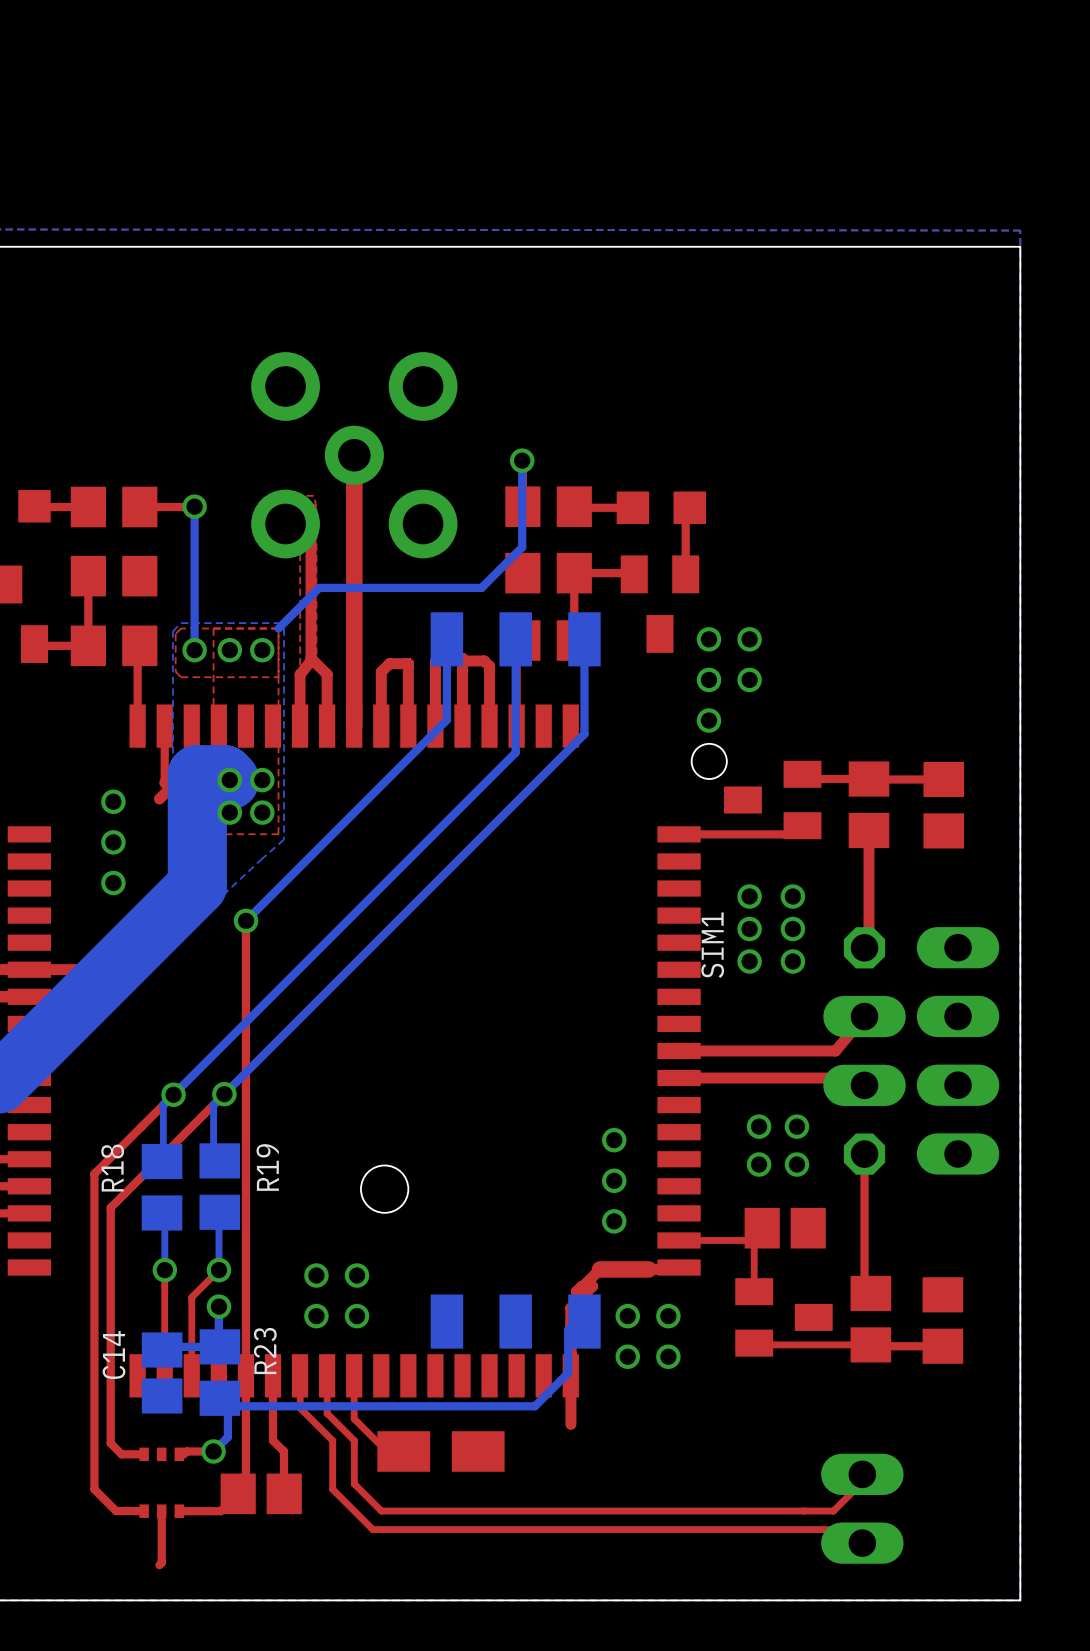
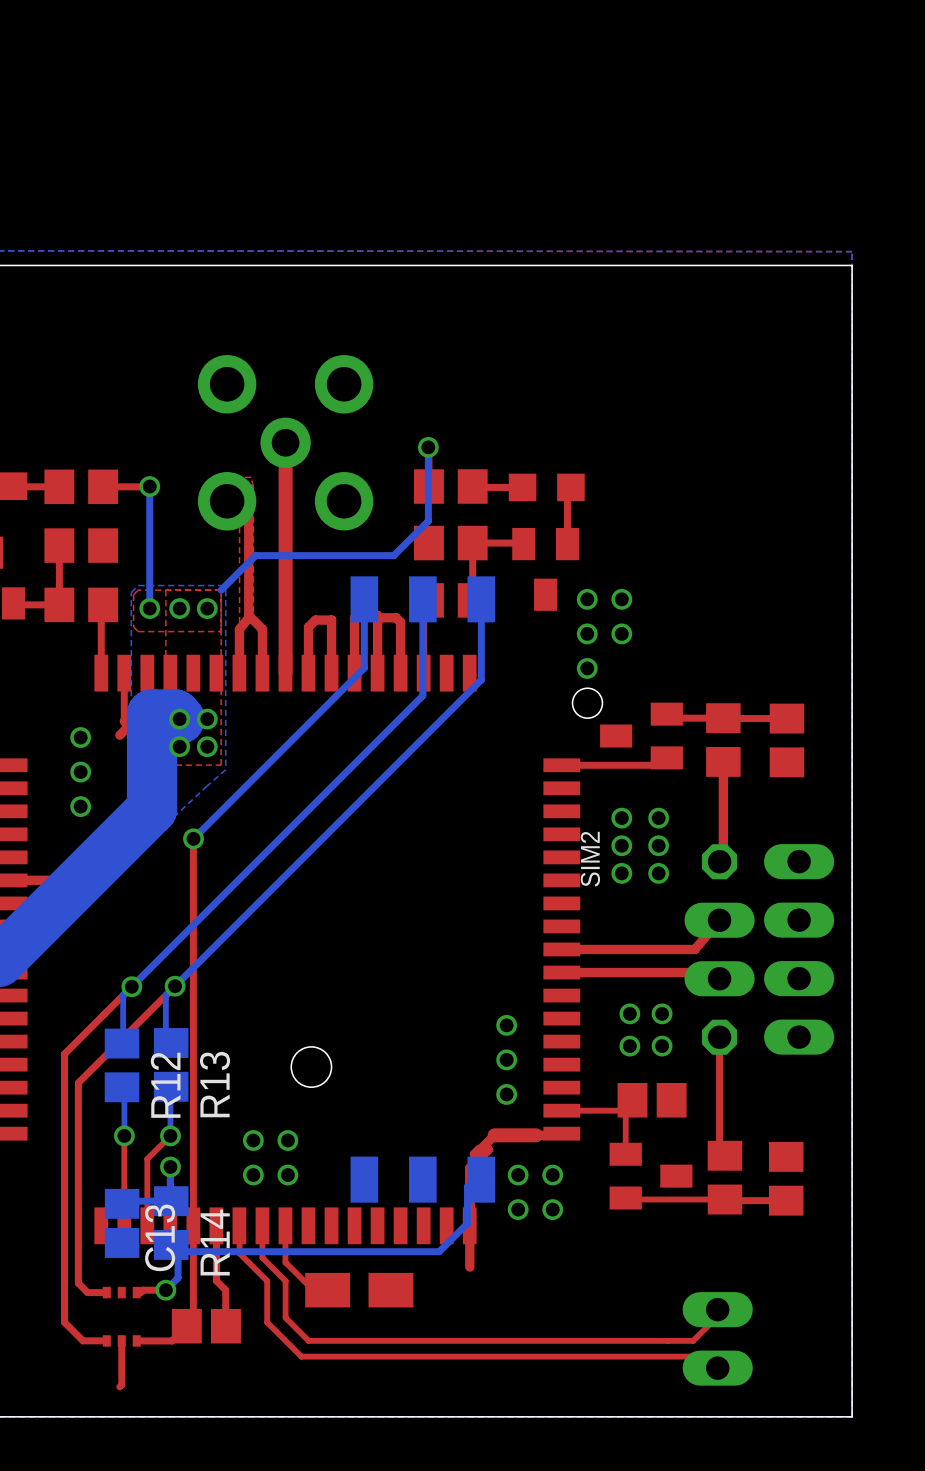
SIM1 name: SIM1 (712, 945) -> SIM2 (590, 859)
R19 name: R19 (267, 1167) -> R13 (215, 1084)
R18 name: R18 (112, 1168) -> R12 (165, 1085)
R23 name: R23 (265, 1351) -> R14 (215, 1242)
C14 name: C14 (114, 1355) -> C13 (160, 1237)

